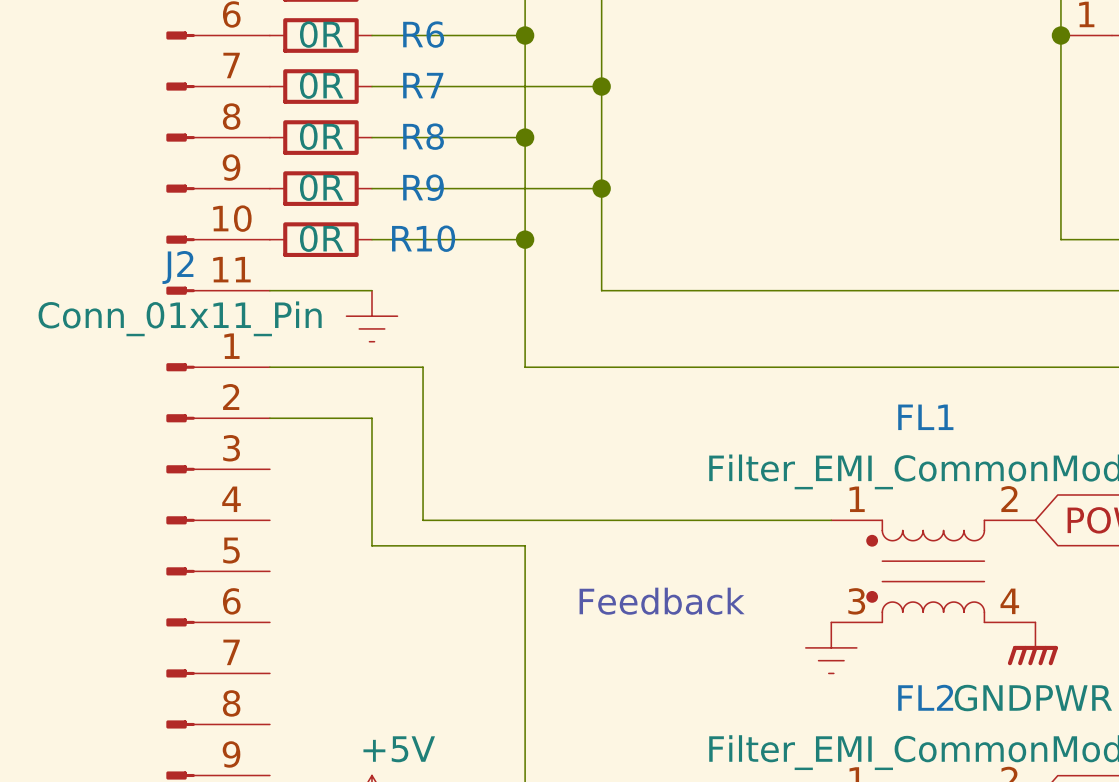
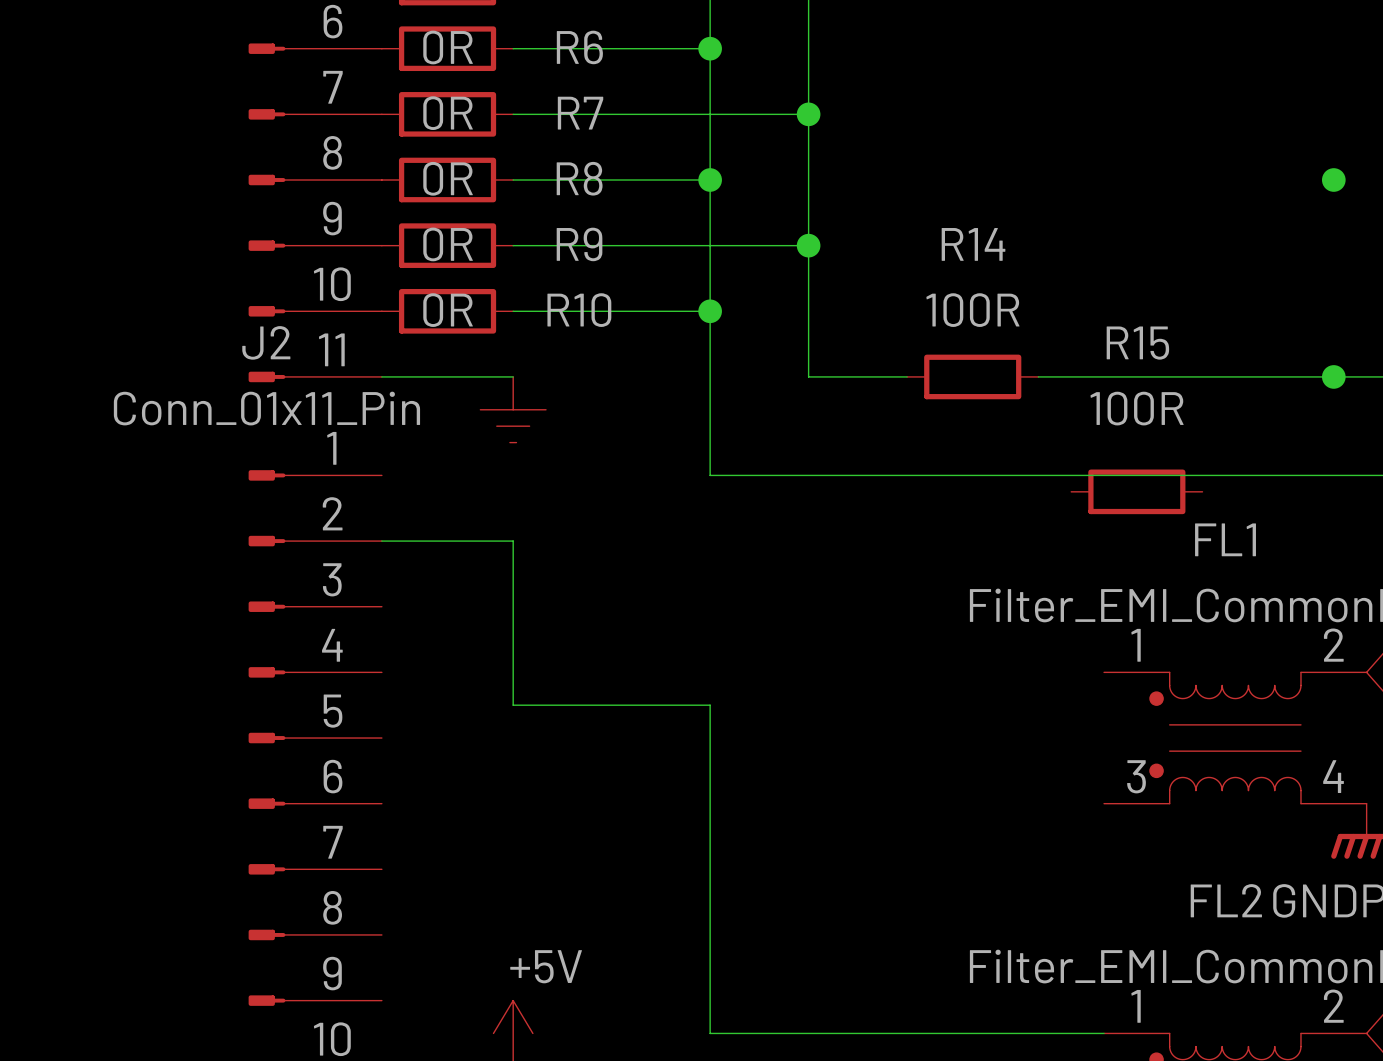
junction: none -> (1333, 180)
wire: (678, 290) (780, 290) -> none
R14: none -> 100R (972, 376)
junction: none -> (1333, 376)
wire: (269, 367) (423, 367) (423, 520) (831, 520) -> none
R15: none -> 100R (1136, 491)
text: Feedback (662, 601) -> none
power symbol: (831, 647) -> none

